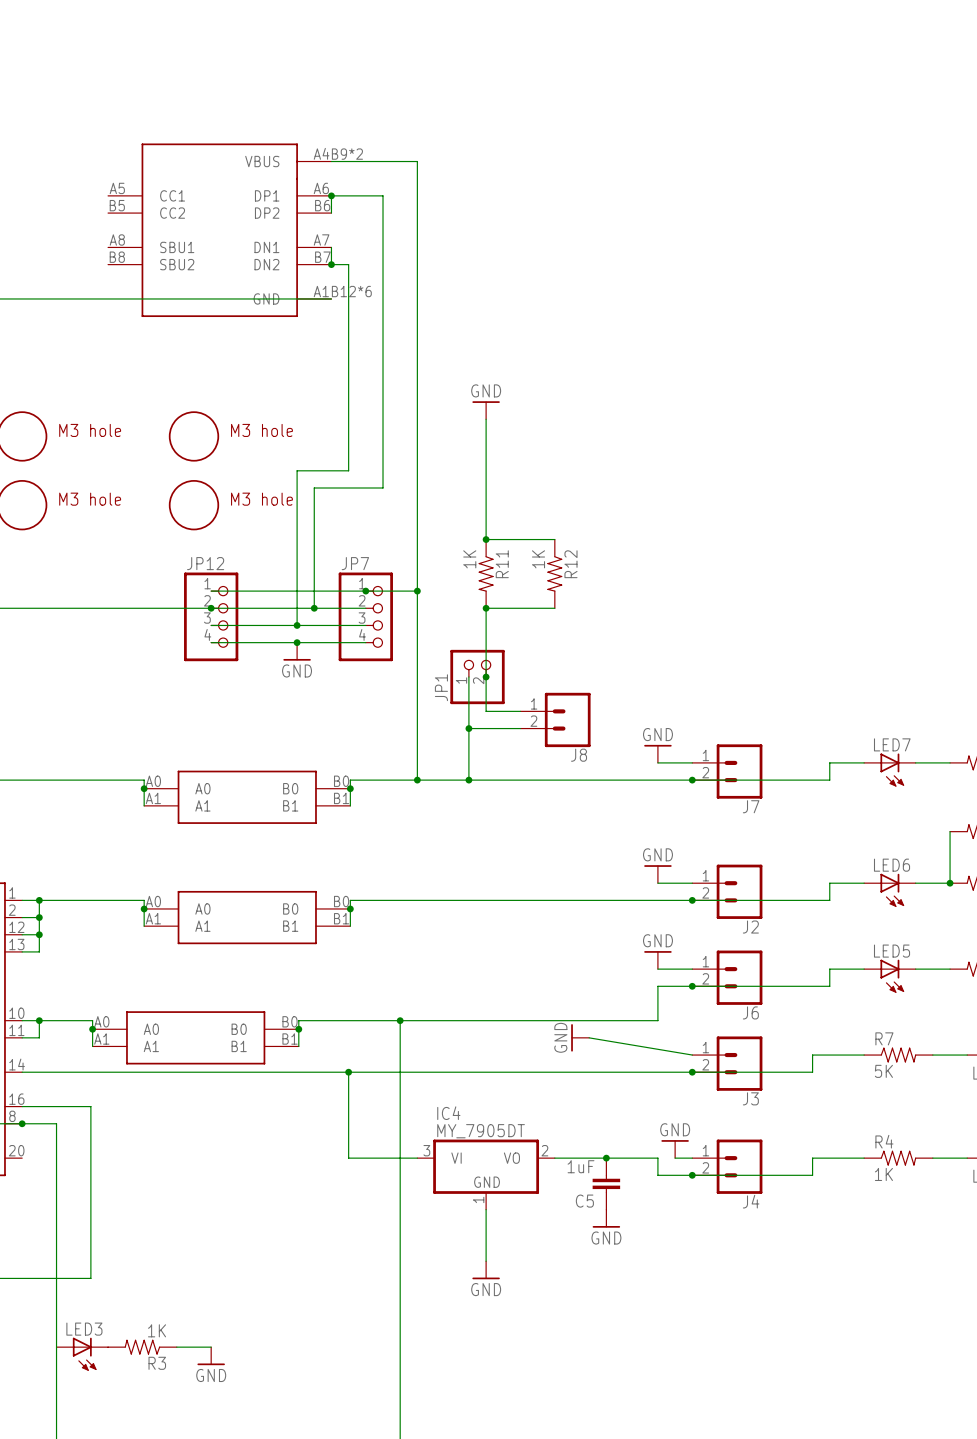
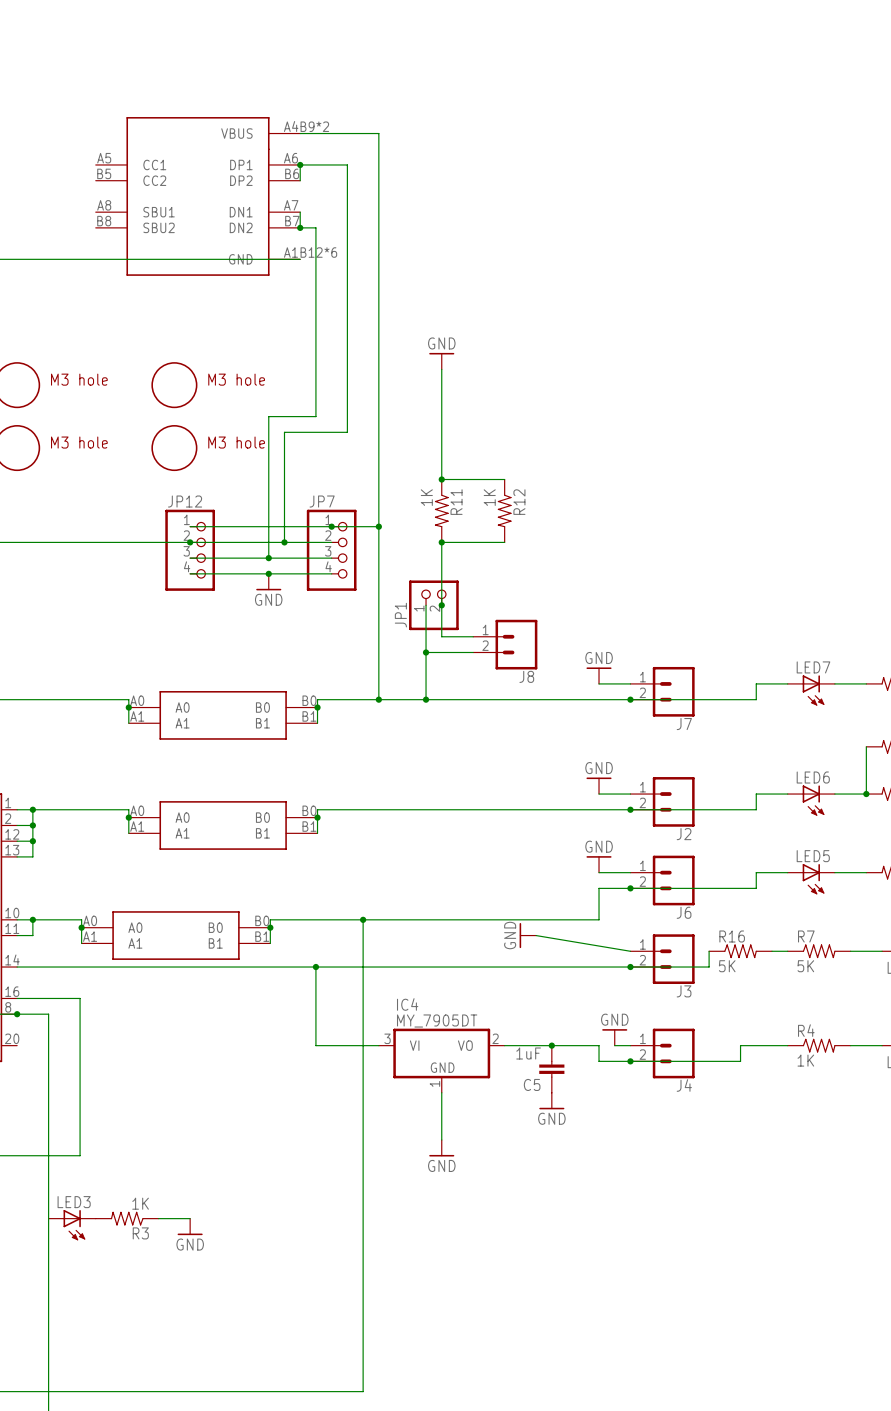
R16: none -> 5K (740, 951)
wire: (846, 1055) (812, 1055) (812, 1072) (778, 1072) -> (709, 951) (709, 967)

